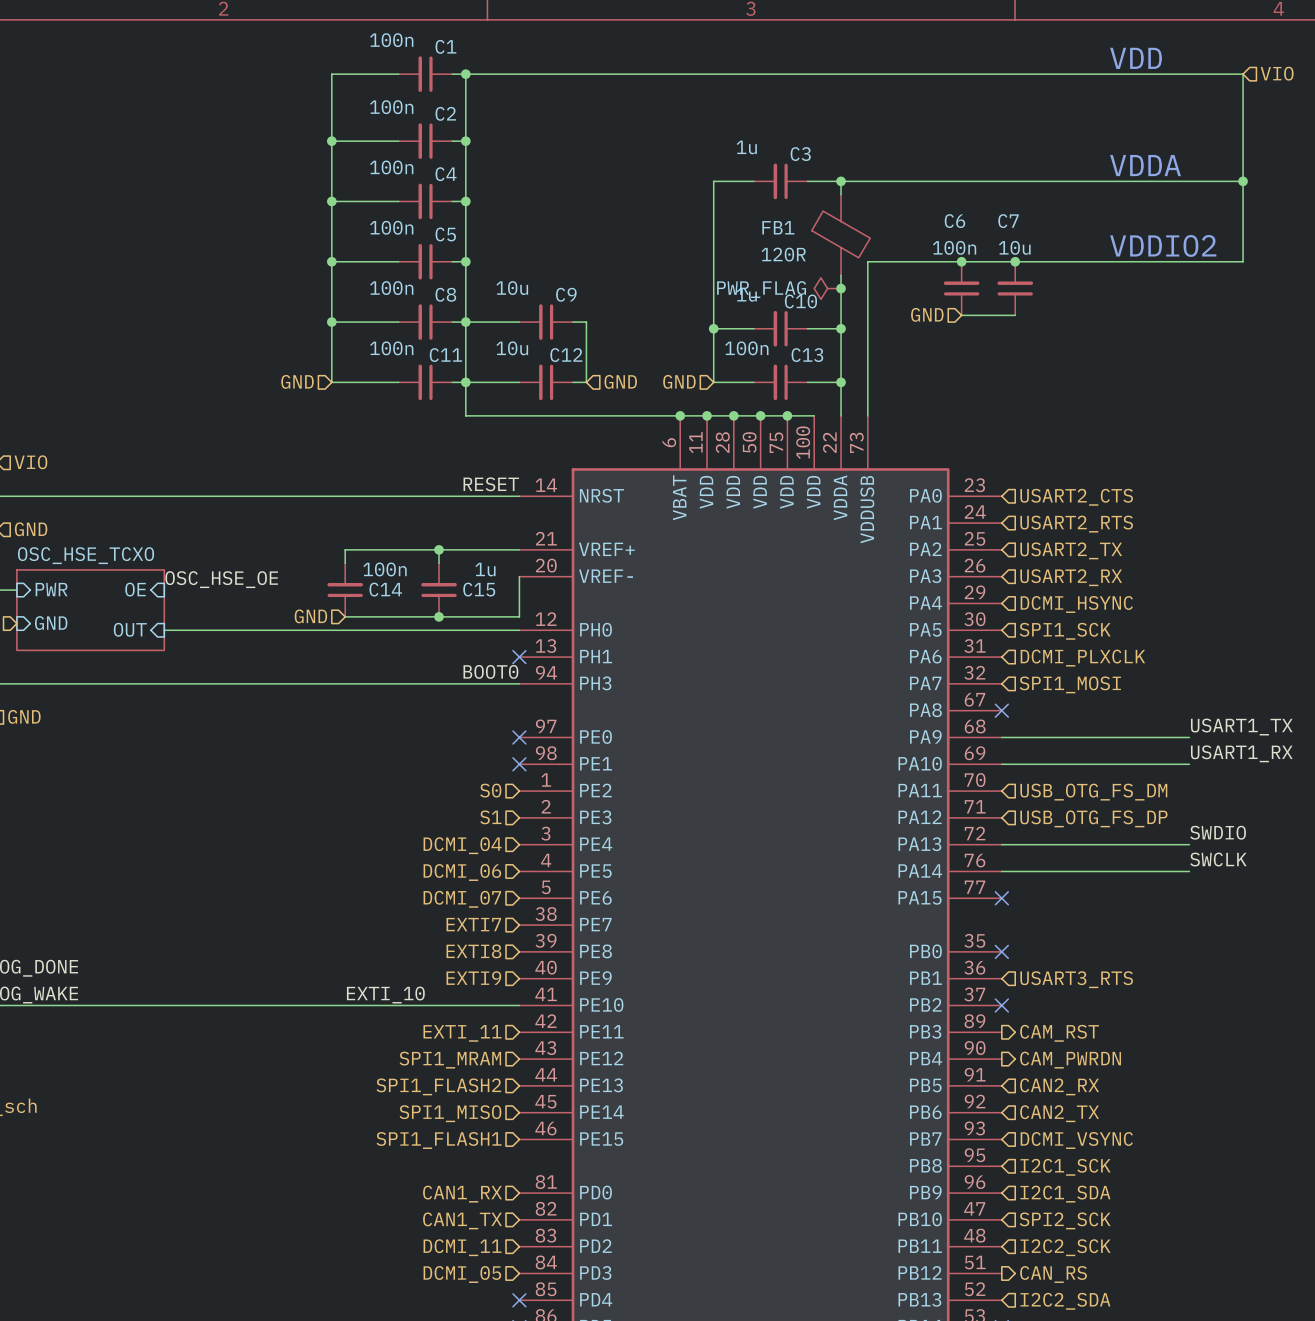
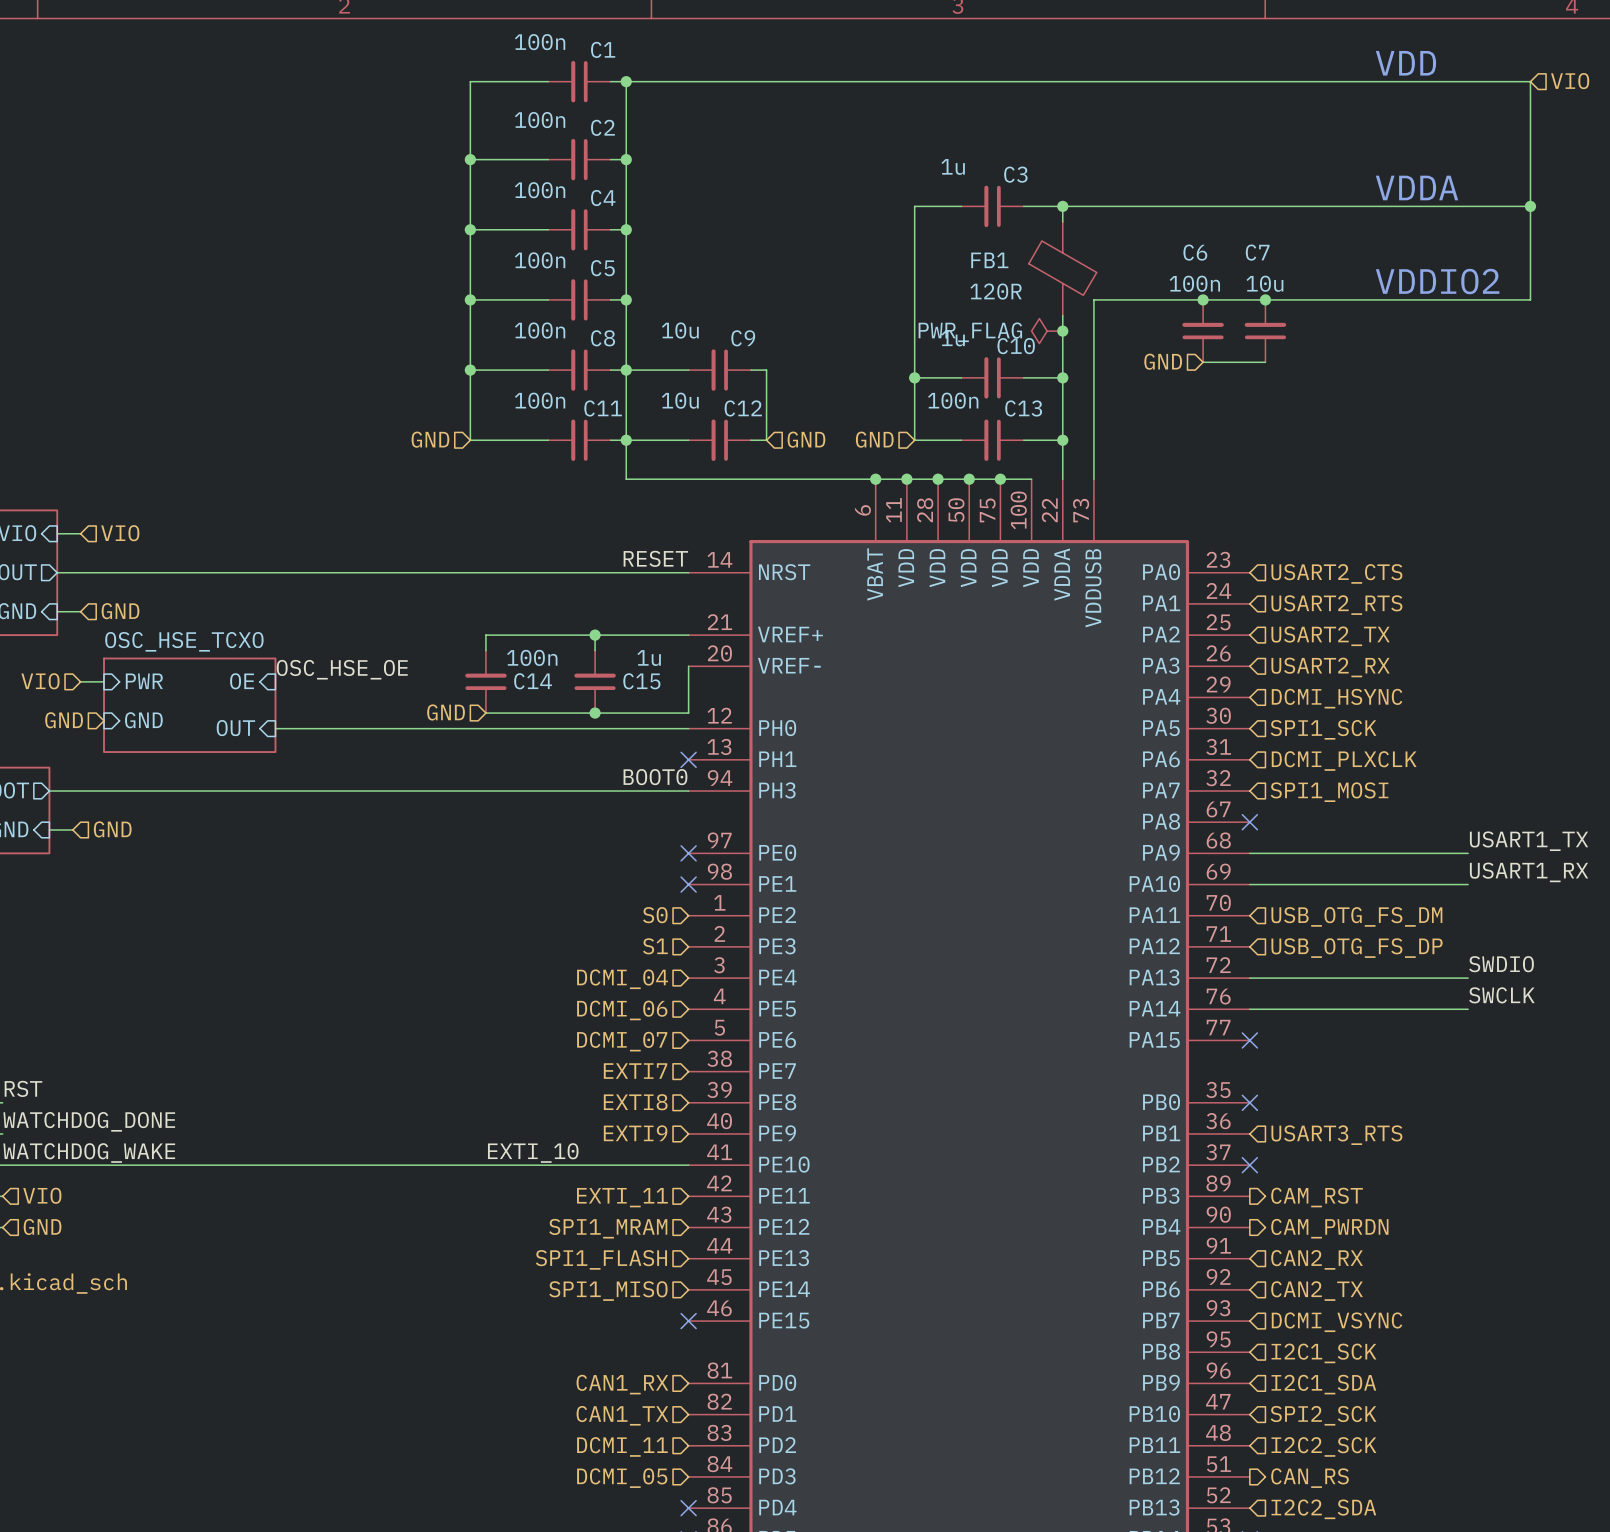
hierarchical label: SPI1_FLASH2 (438, 1086) -> SPI1_FLASH (601, 1259)
no-connect mark: none -> (688, 1321)
hierarchical label: SPI1_FLASH1 (439, 1140) -> none

